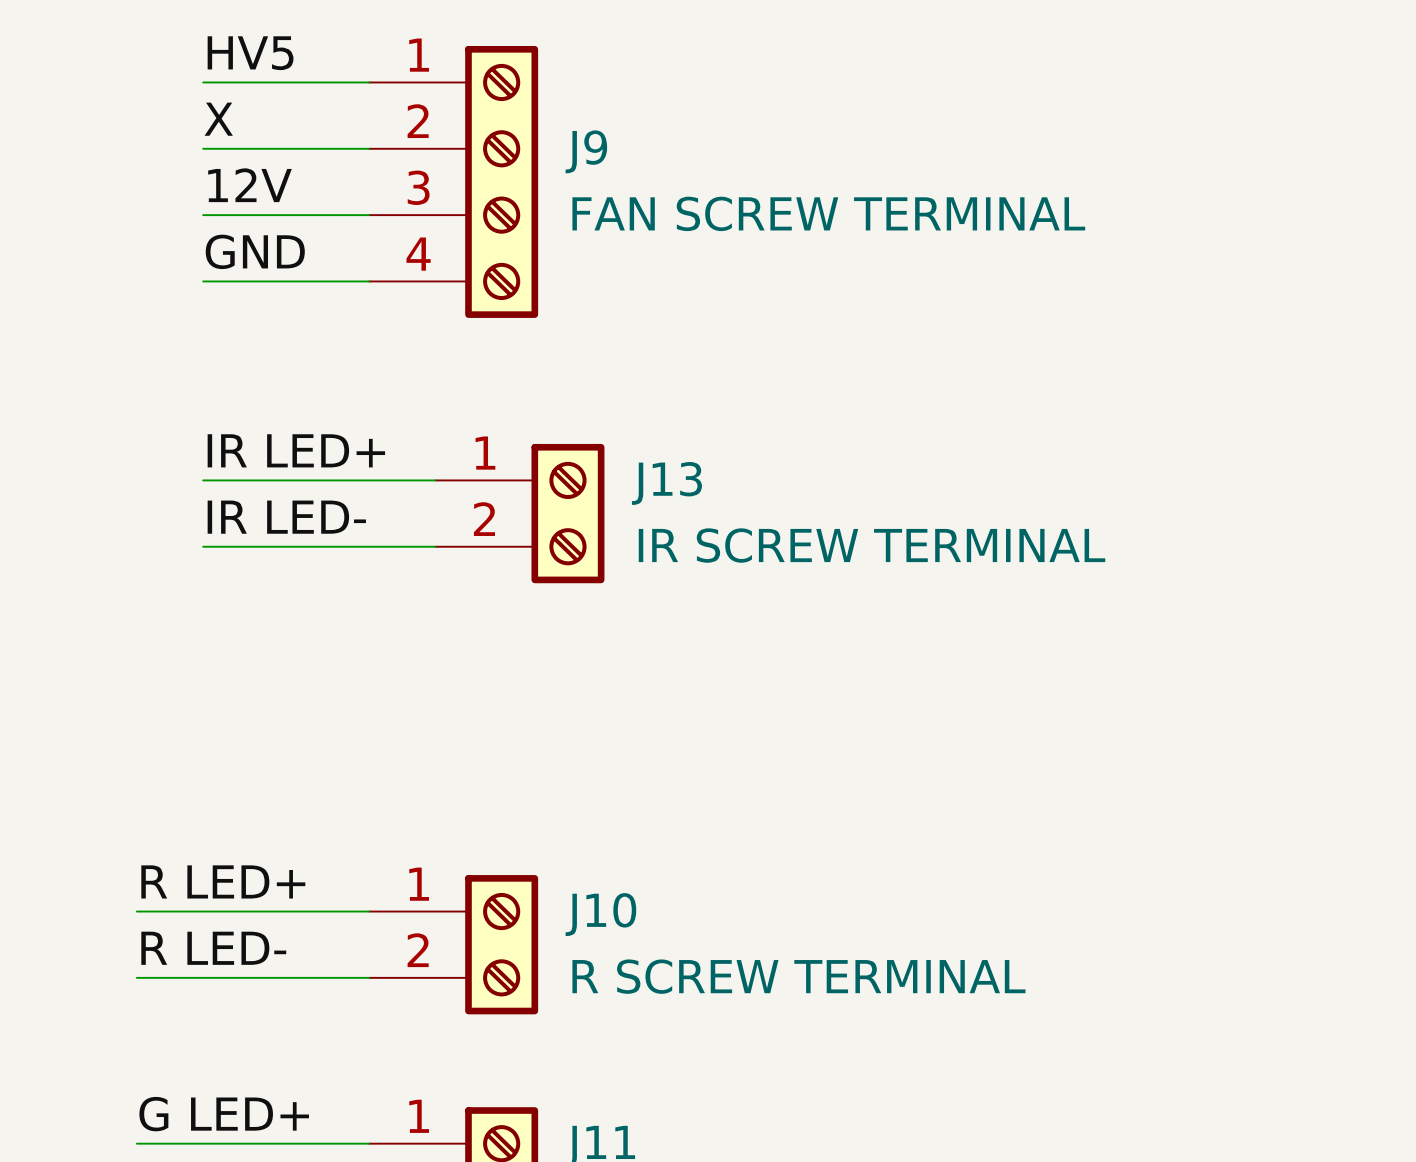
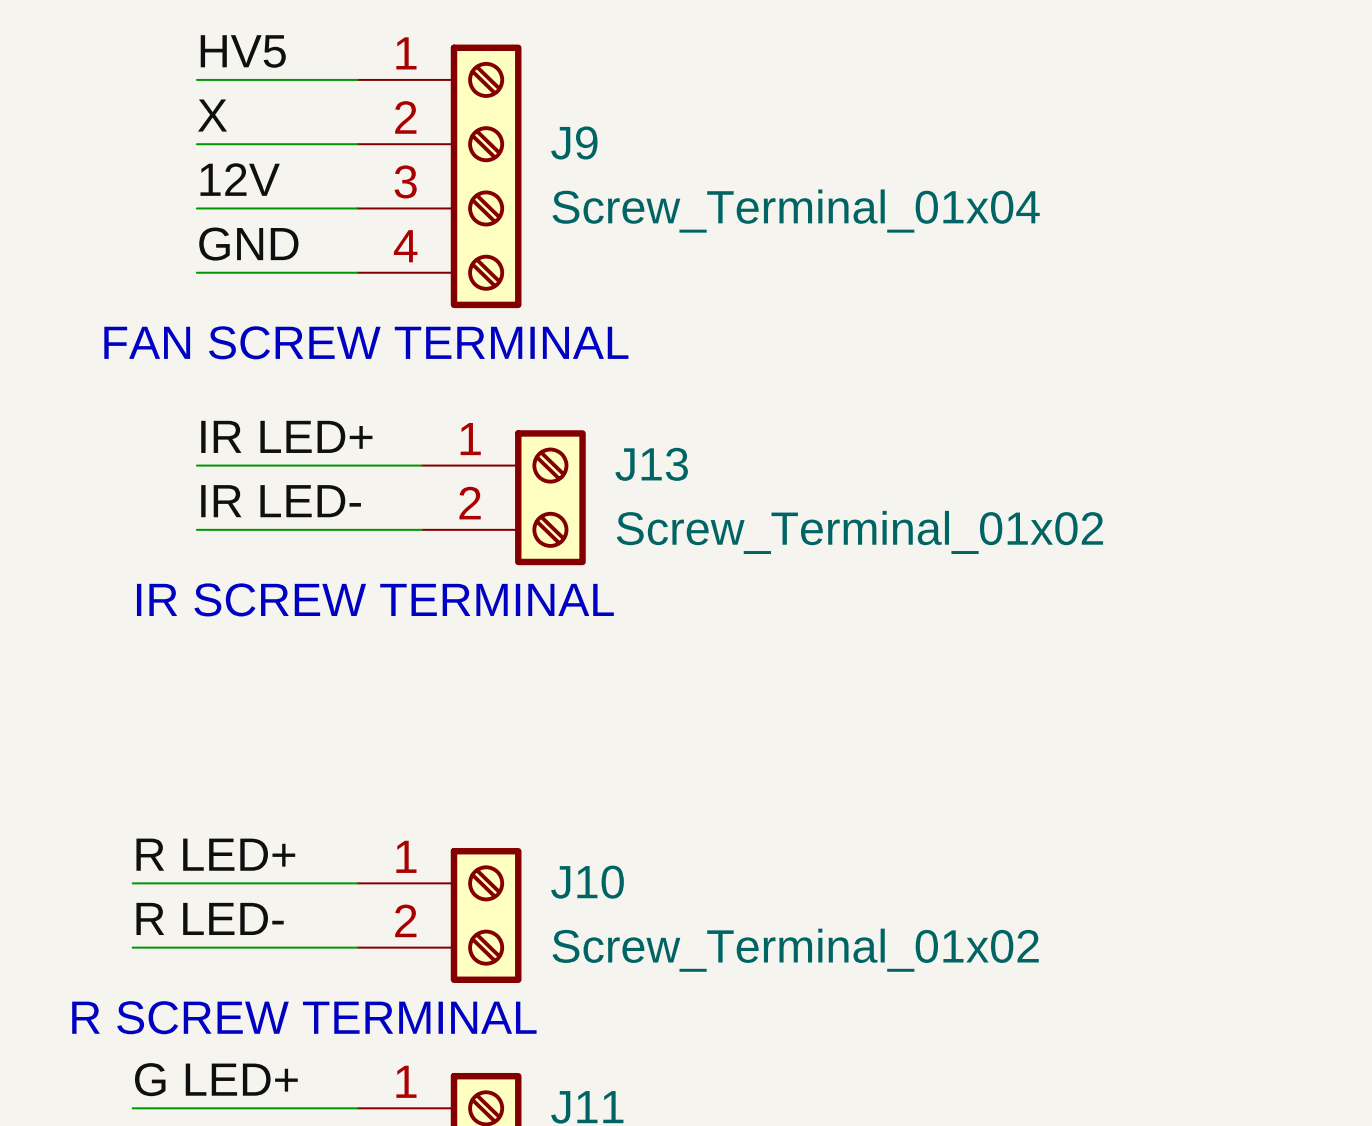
J9 value: FAN SCREW TERMINAL (828, 213) -> Screw_Terminal_01x04 (796, 211)
text: none -> FAN SCREW TERMINAL (366, 342)
J13 value: IR SCREW TERMINAL (871, 545) -> Screw_Terminal_01x02 (859, 532)
text: none -> IR SCREW TERMINAL (375, 599)
J10 value: R SCREW TERMINAL (798, 976) -> Screw_Terminal_01x02 (795, 950)
text: none -> R SCREW TERMINAL (304, 1017)

